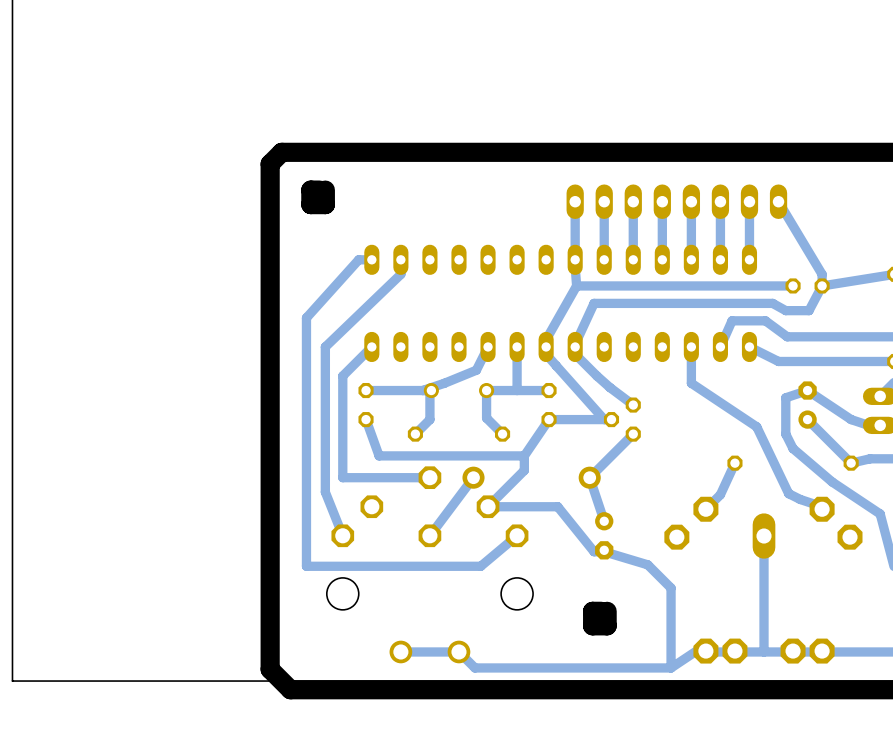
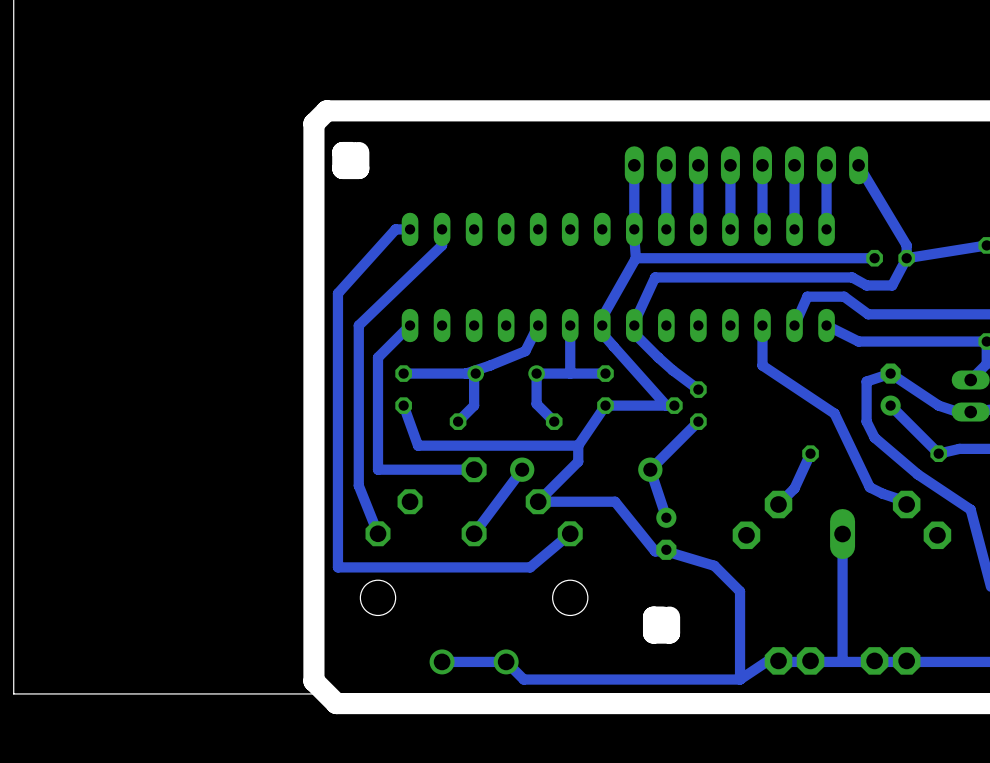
board edge: (296, 152) (281, 152) (270, 163) (270, 669) (290, 689) (305, 689) -> (326, 110) (313, 123) (313, 681) (336, 703)

